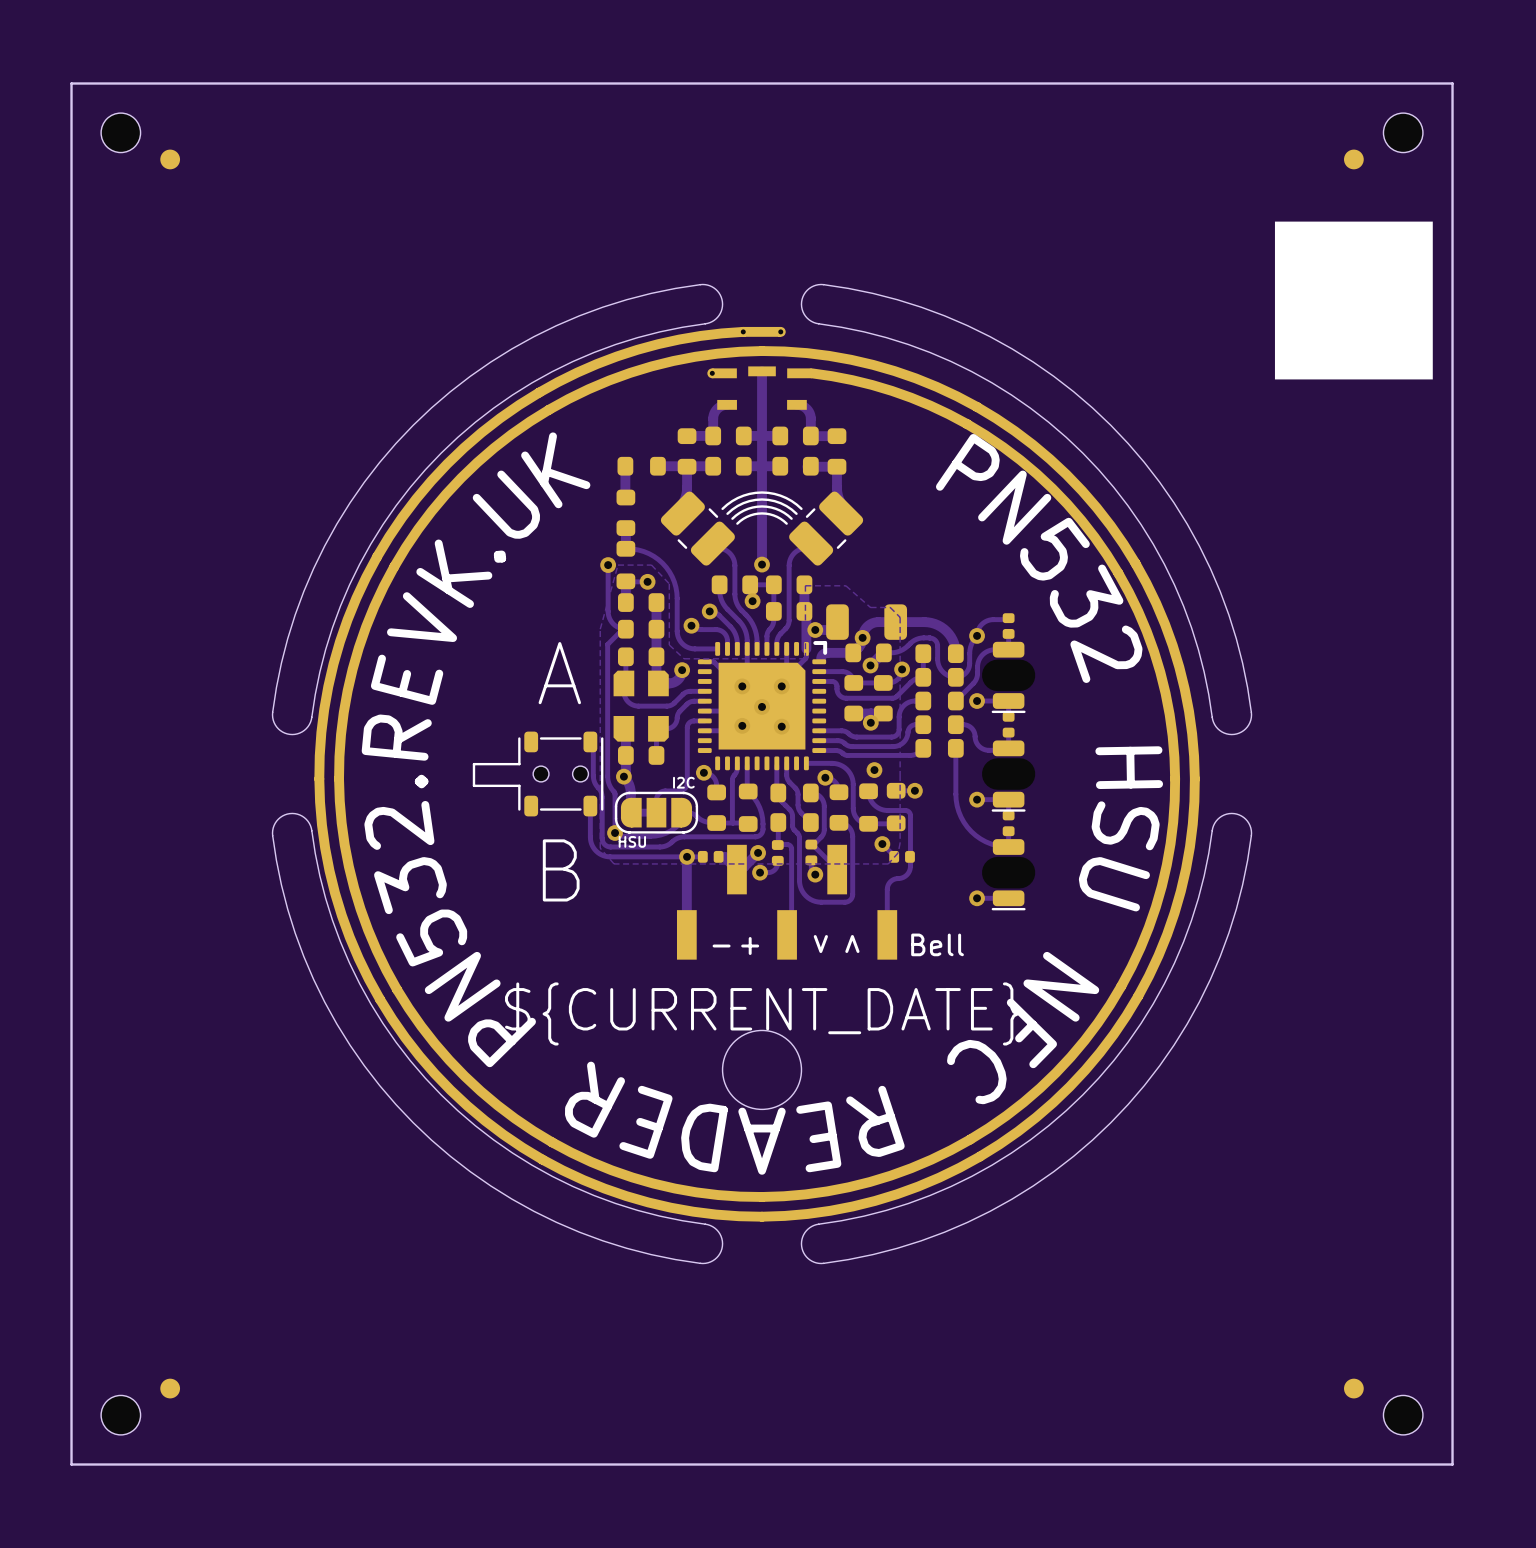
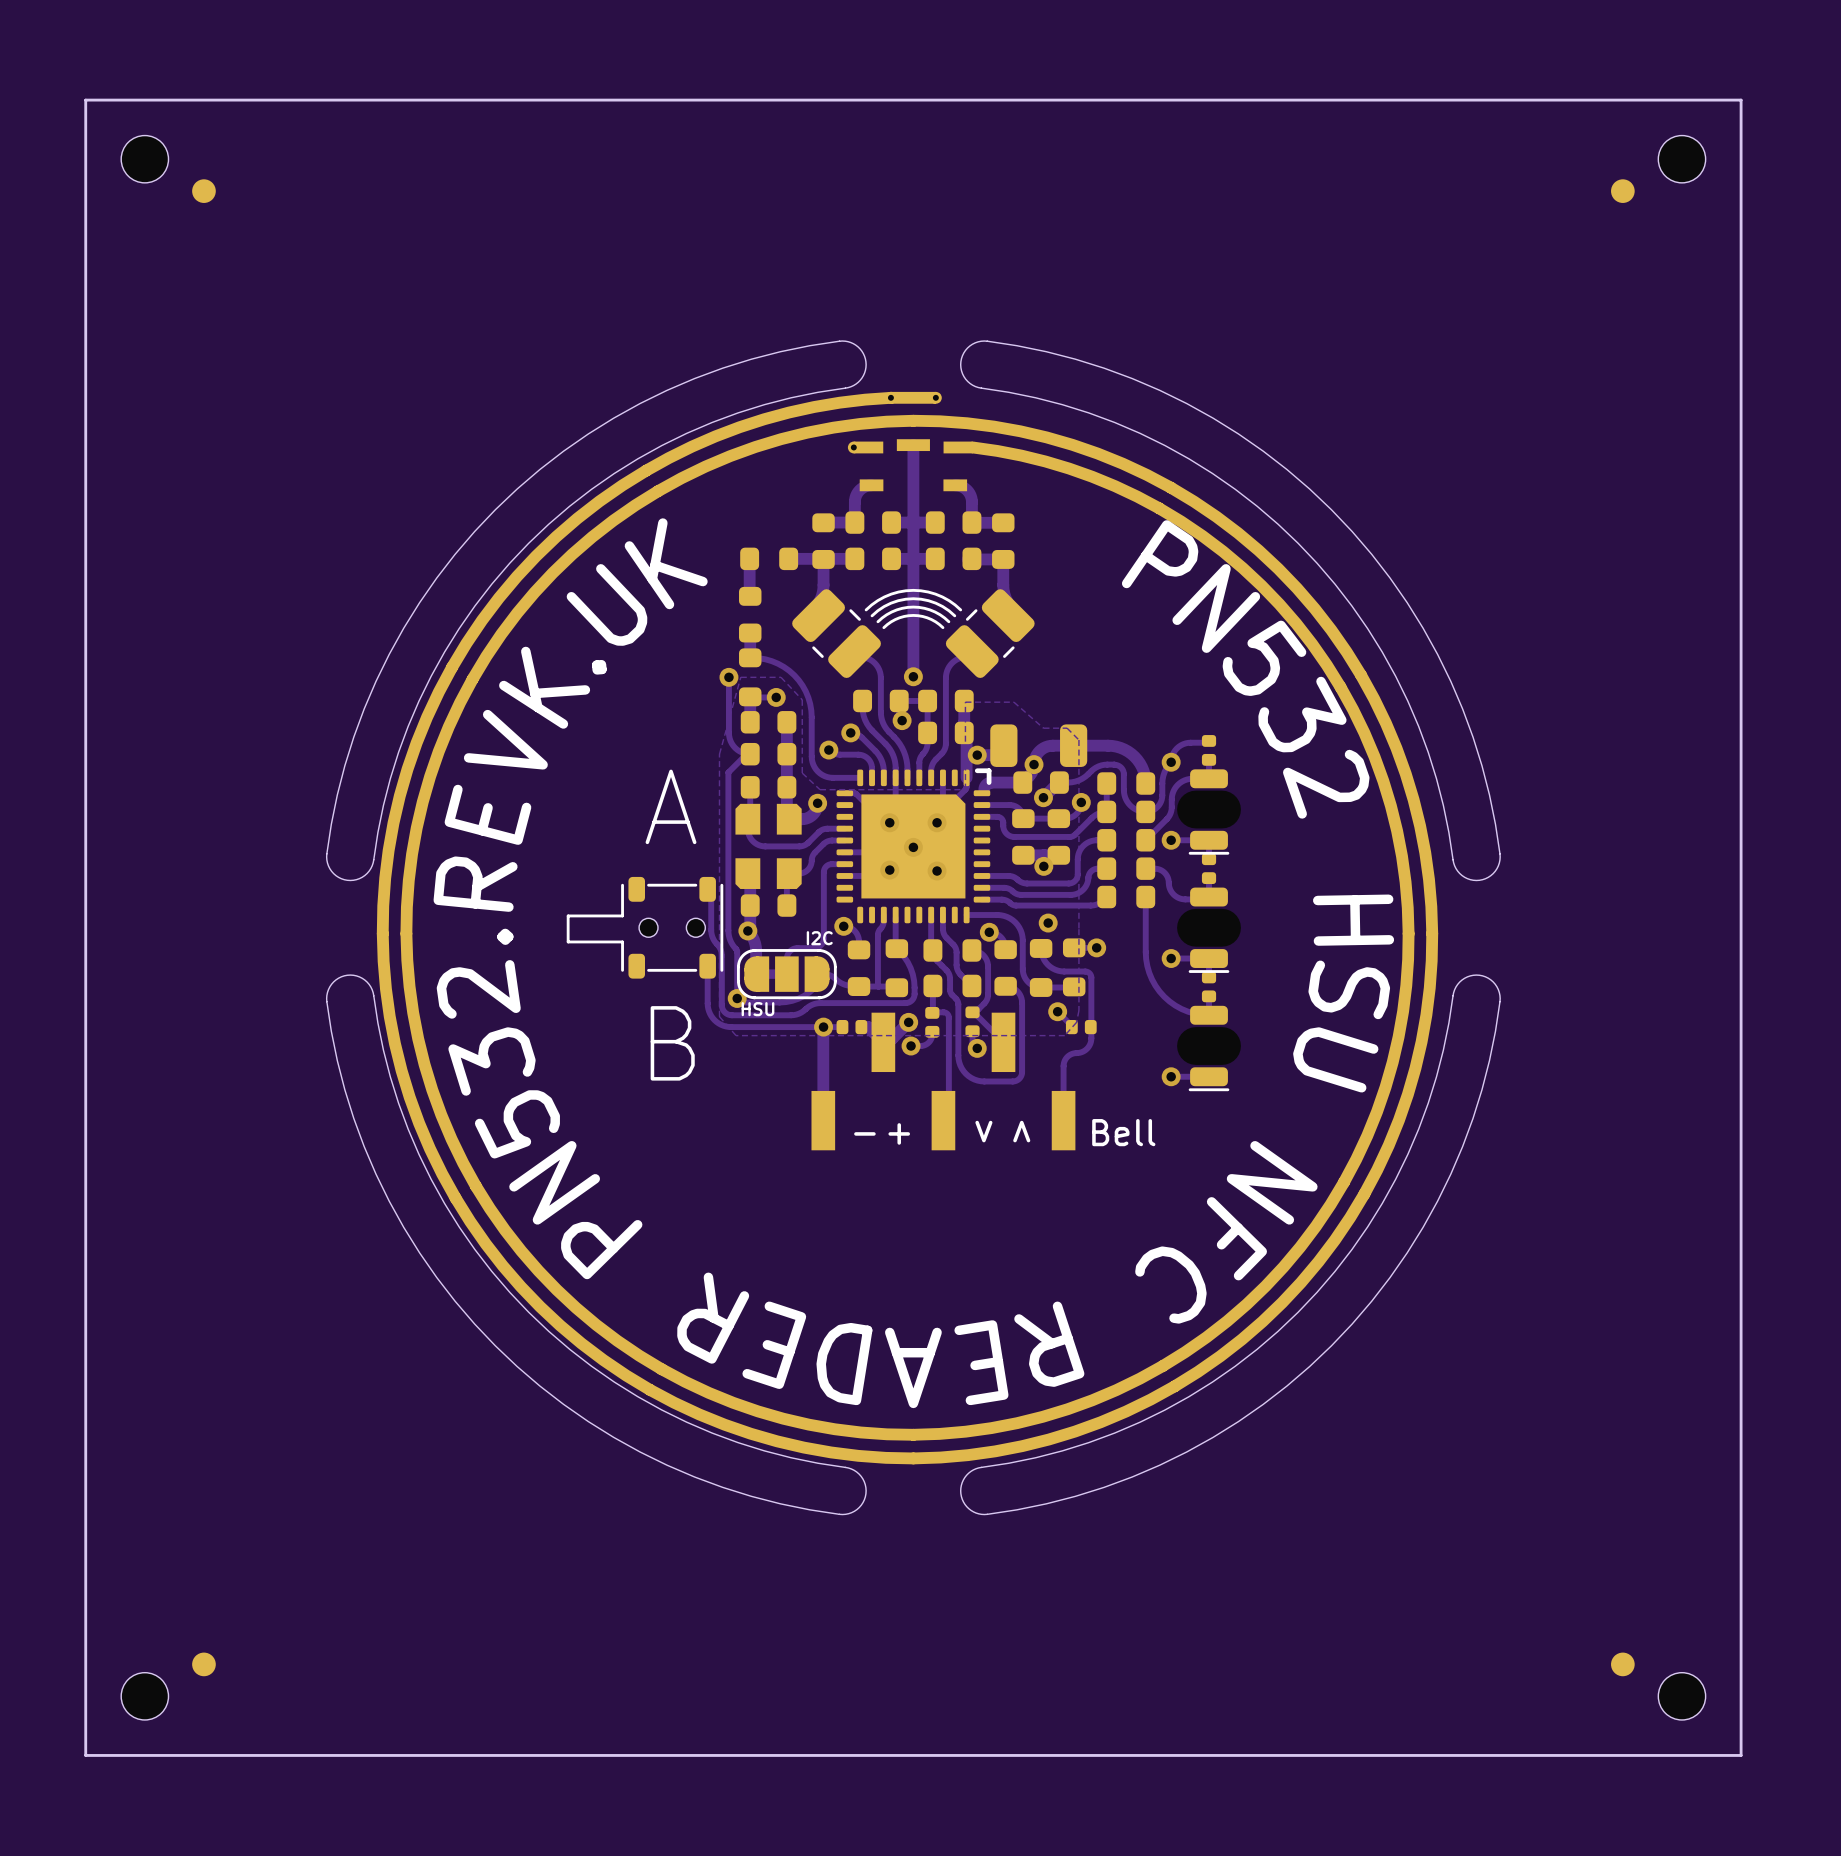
drawing: [1274, 221, 1433, 380] -> none
text: ${CURRENT_DATE} (762, 1013) -> none
round board edge: [722, 1029, 802, 1110] -> none

